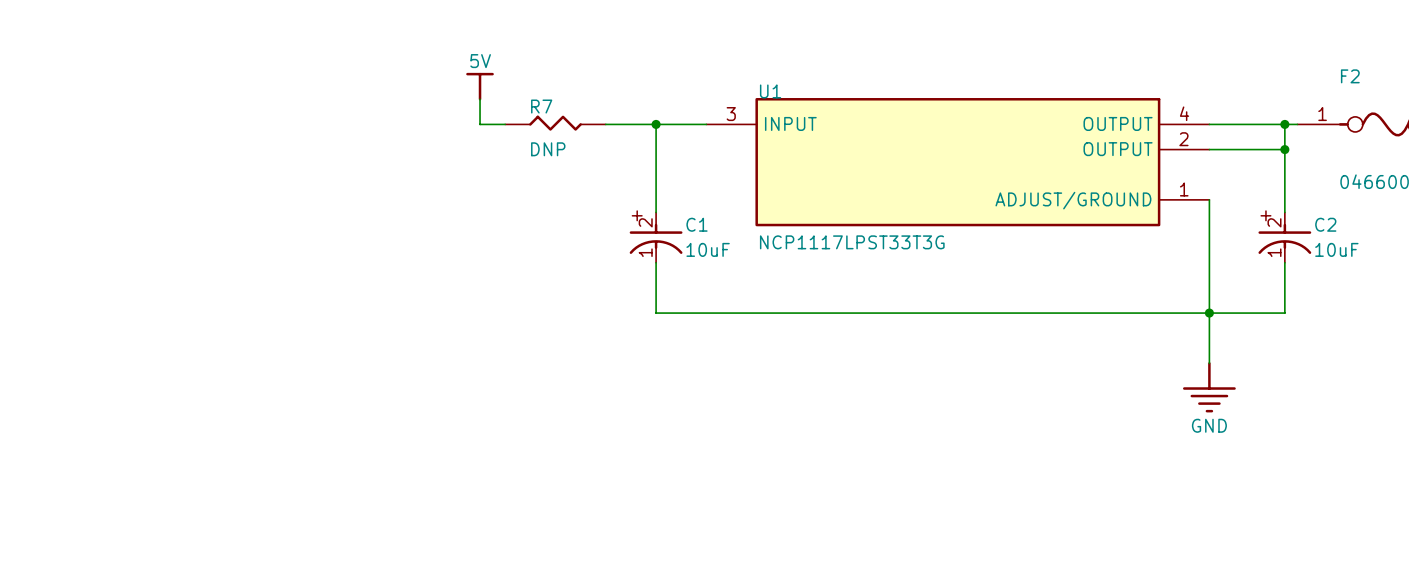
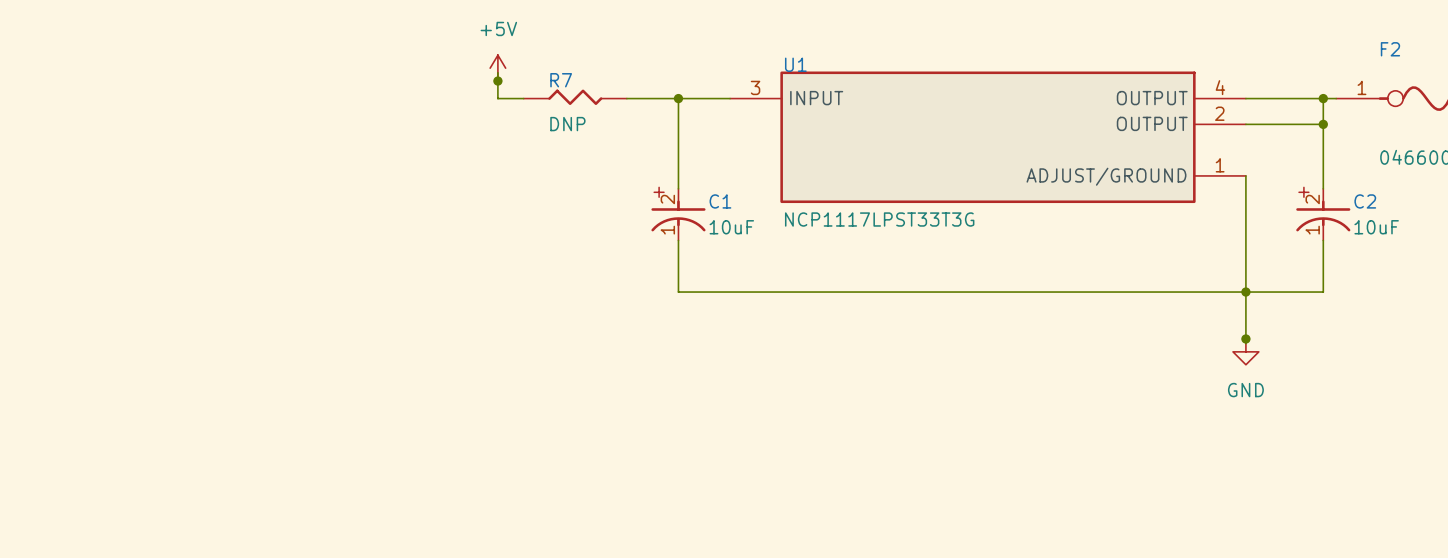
power symbol: 5V (480, 86) -> +5V (497, 68)
junction: none -> (497, 81)
junction: none -> (1245, 338)
power symbol: none -> GND (1245, 351)
power symbol: GND (1209, 387) -> none

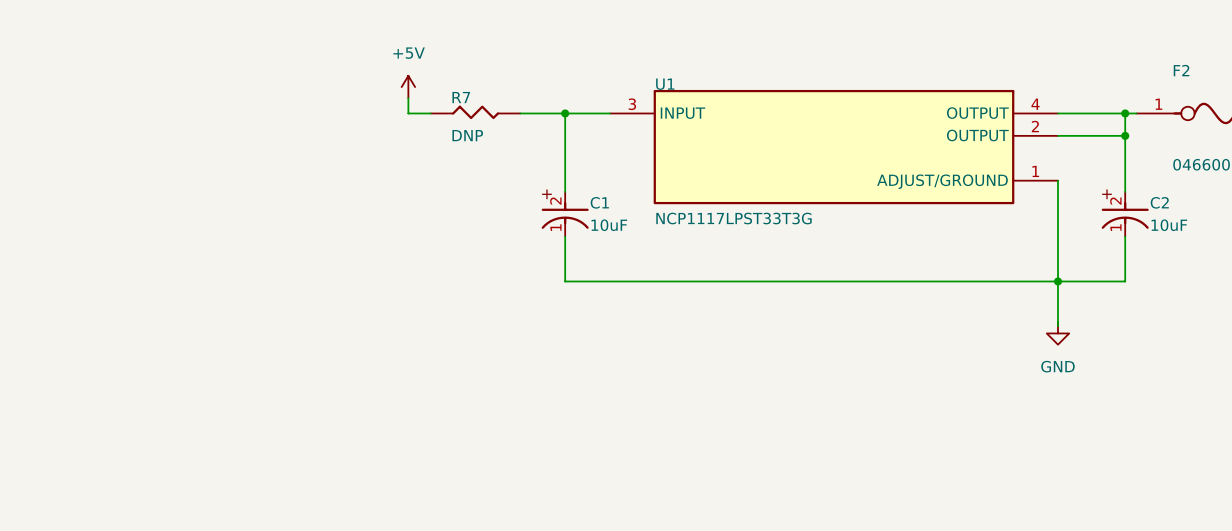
junction: (497, 81) -> none
junction: (1245, 338) -> none

